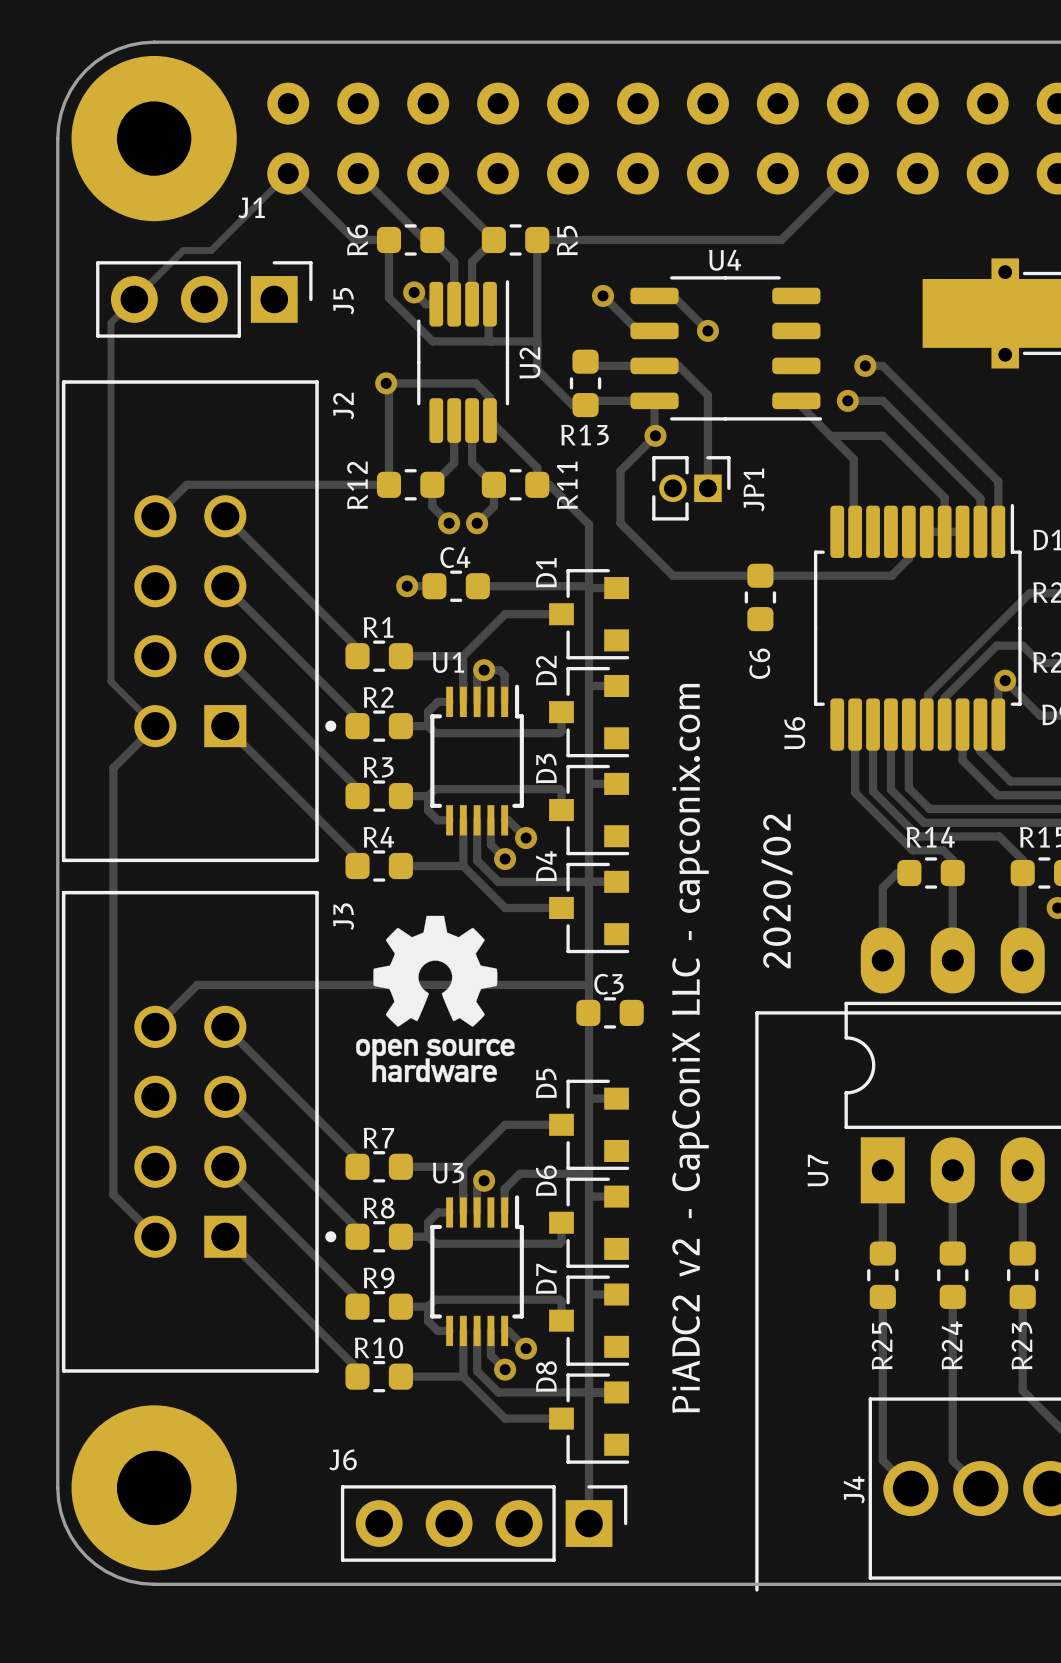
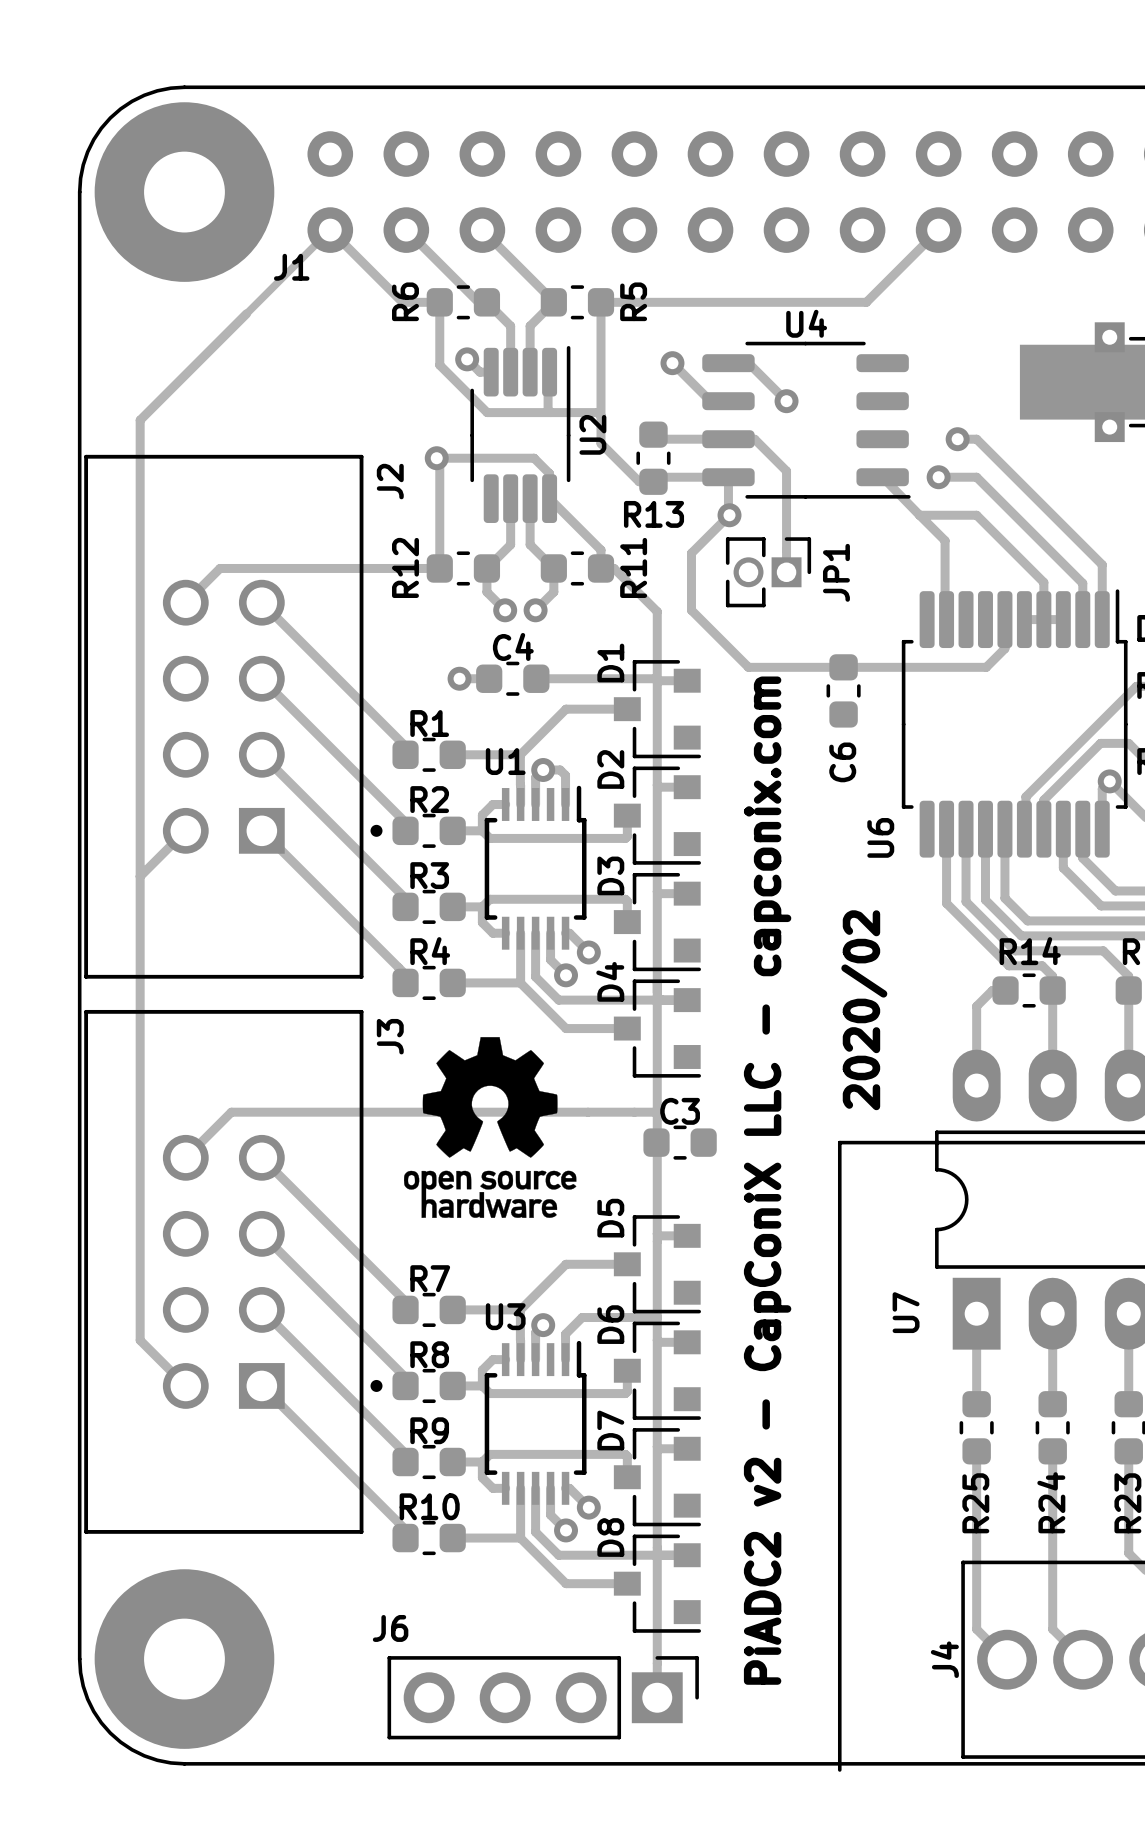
track: (211, 250) (183, 250) (110, 322) (110, 681) (155, 726) -> (246, 313) (140, 420) (140, 876)
J5: (204, 299) -> none

